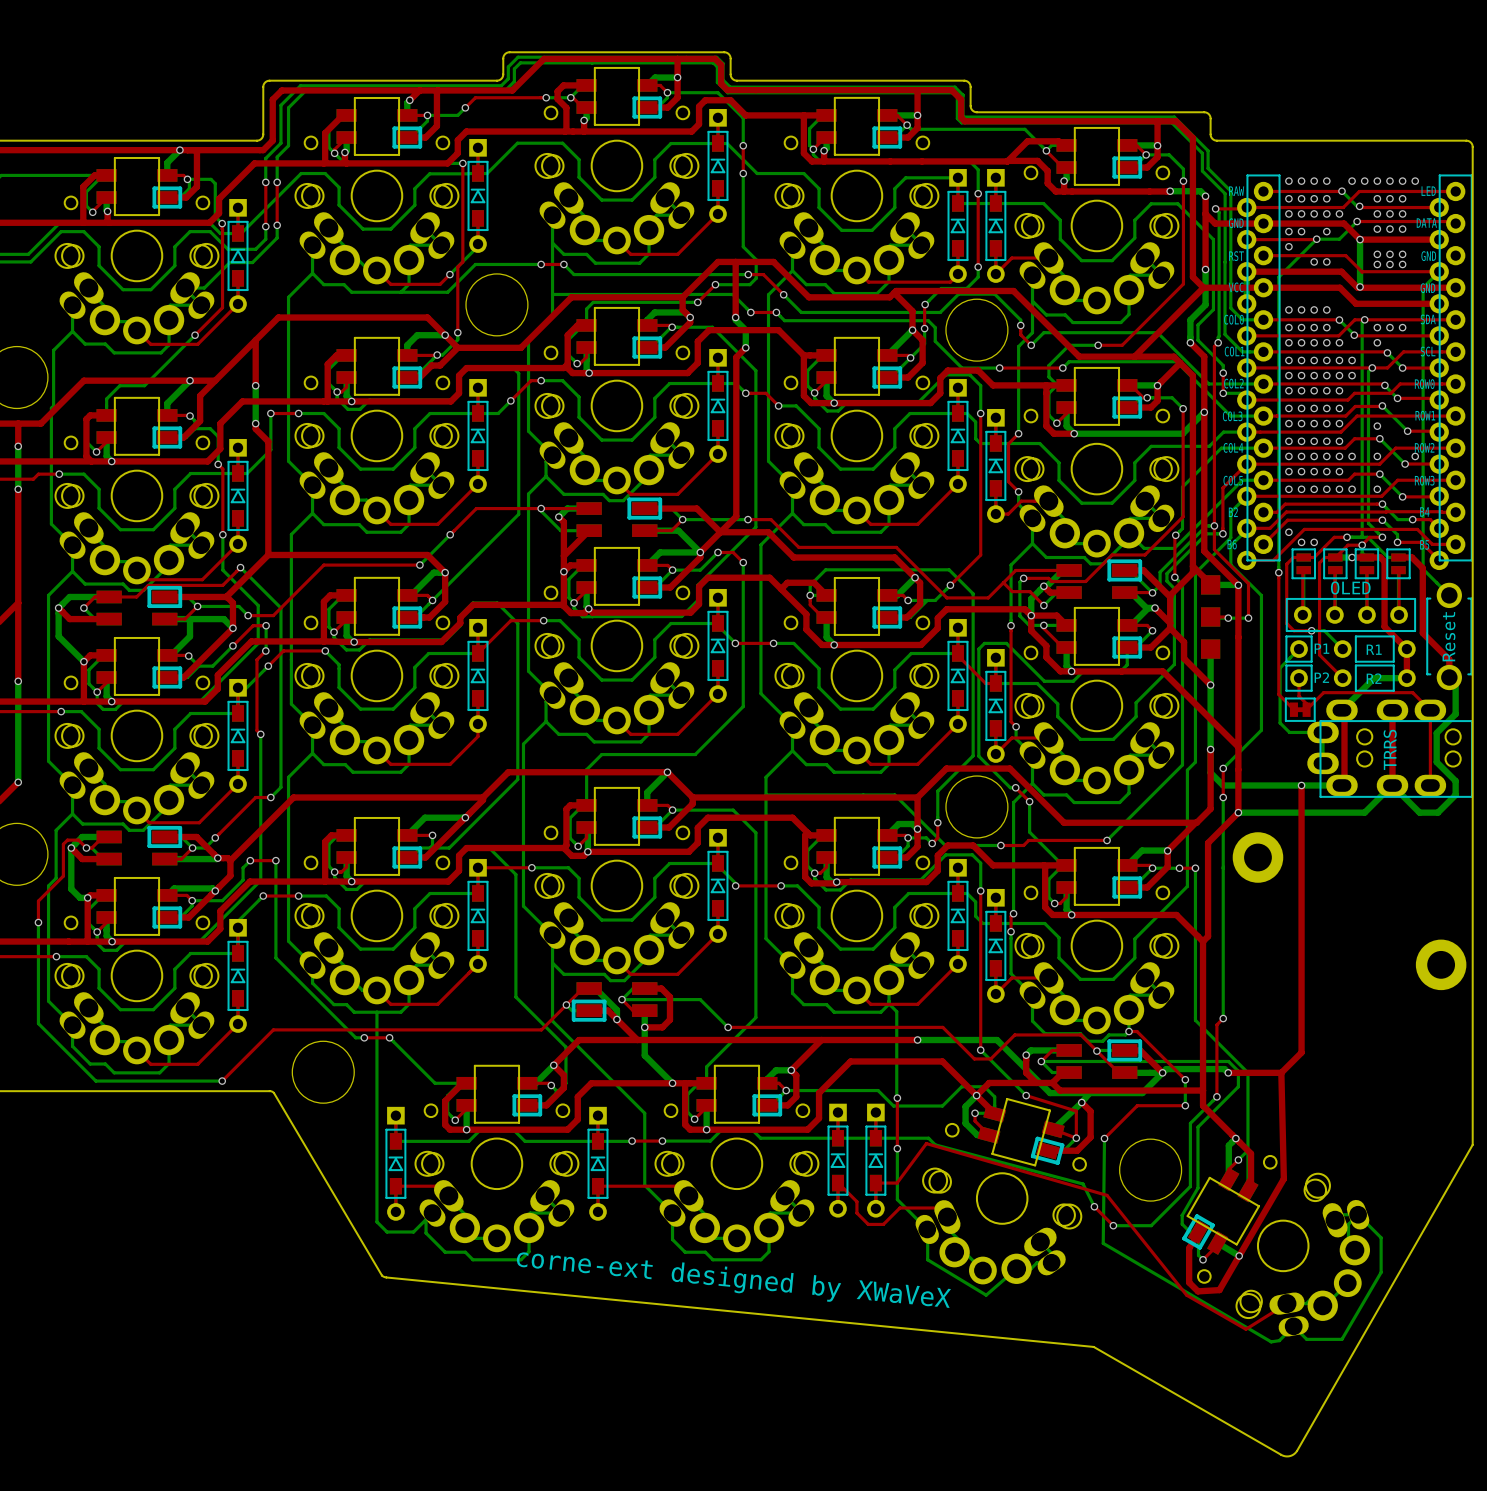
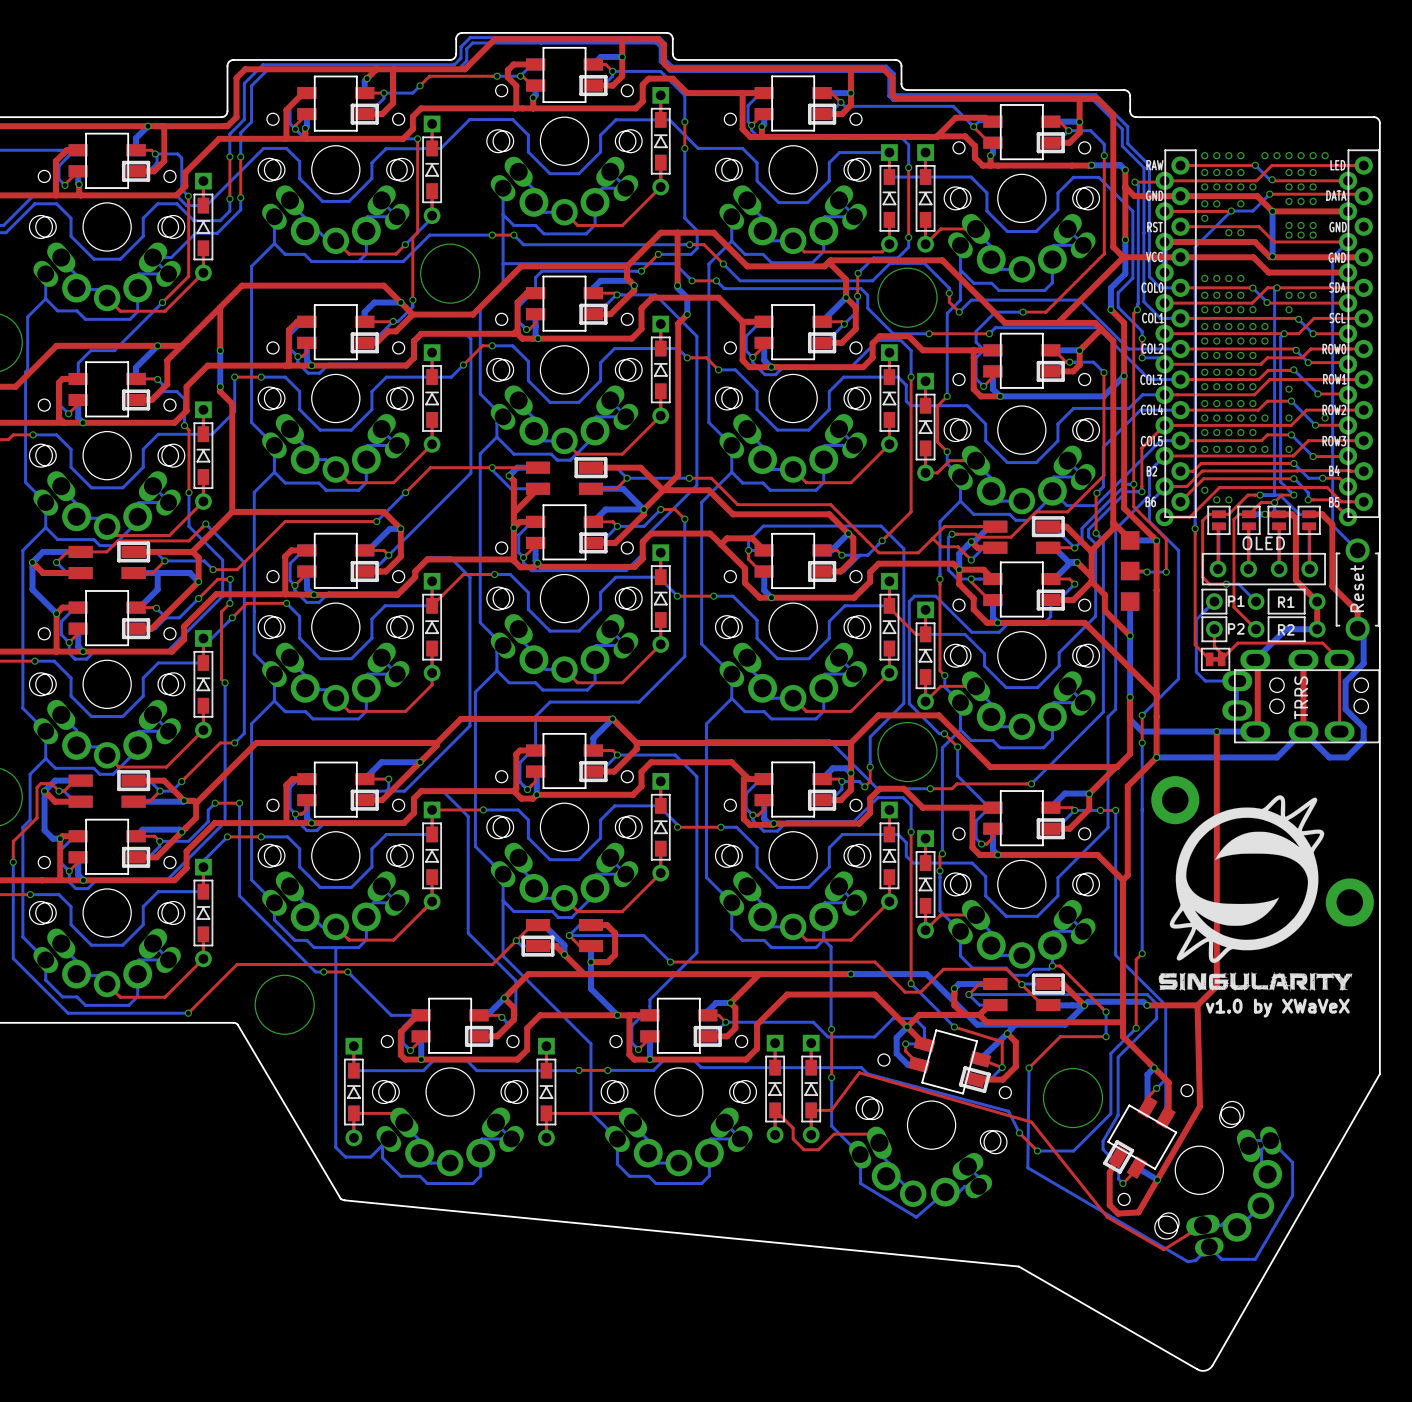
drawing: none -> [1158, 795, 1353, 993]
text: none -> v1.0 by XWaVeX (1277, 1008)
text: corne-ext designed by XWaVeX (733, 1280) -> none

